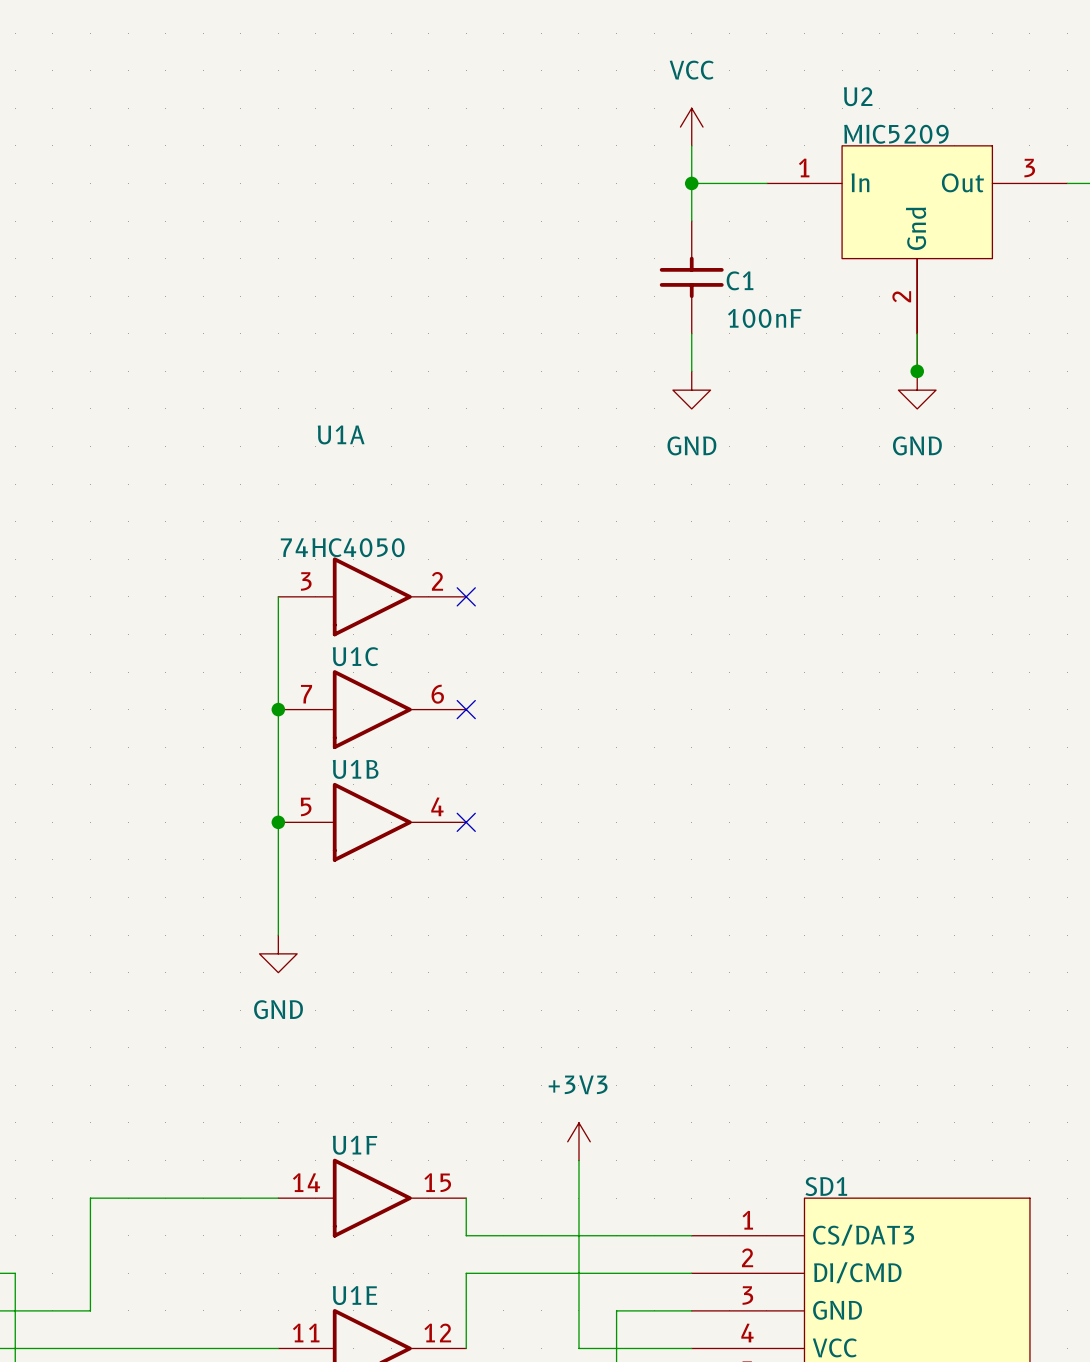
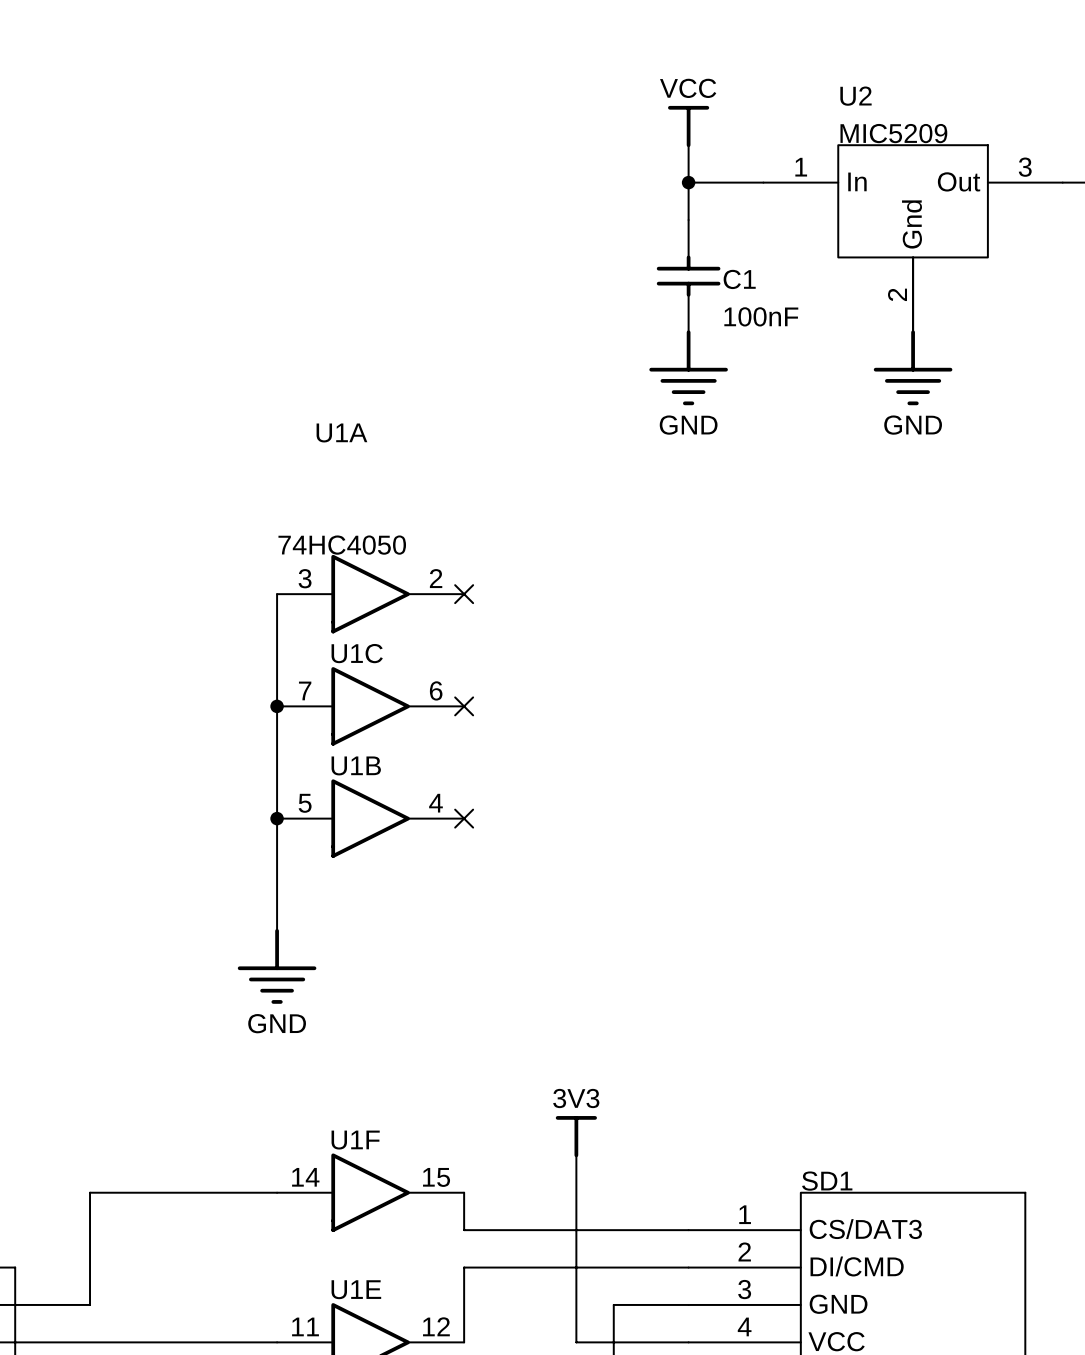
power symbol shape: [680, 108, 704, 146] -> [668, 105, 710, 148]
power symbol: none -> GND (688, 367)
power symbol: none -> GND (913, 367)
junction: (917, 371) -> none
power symbol: GND (691, 390) -> none
power symbol: GND (917, 390) -> none
power symbol: GND (278, 953) -> none
power symbol: none -> GND (277, 966)
power symbol: +3V3 (578, 1141) -> 3V3 (576, 1136)

